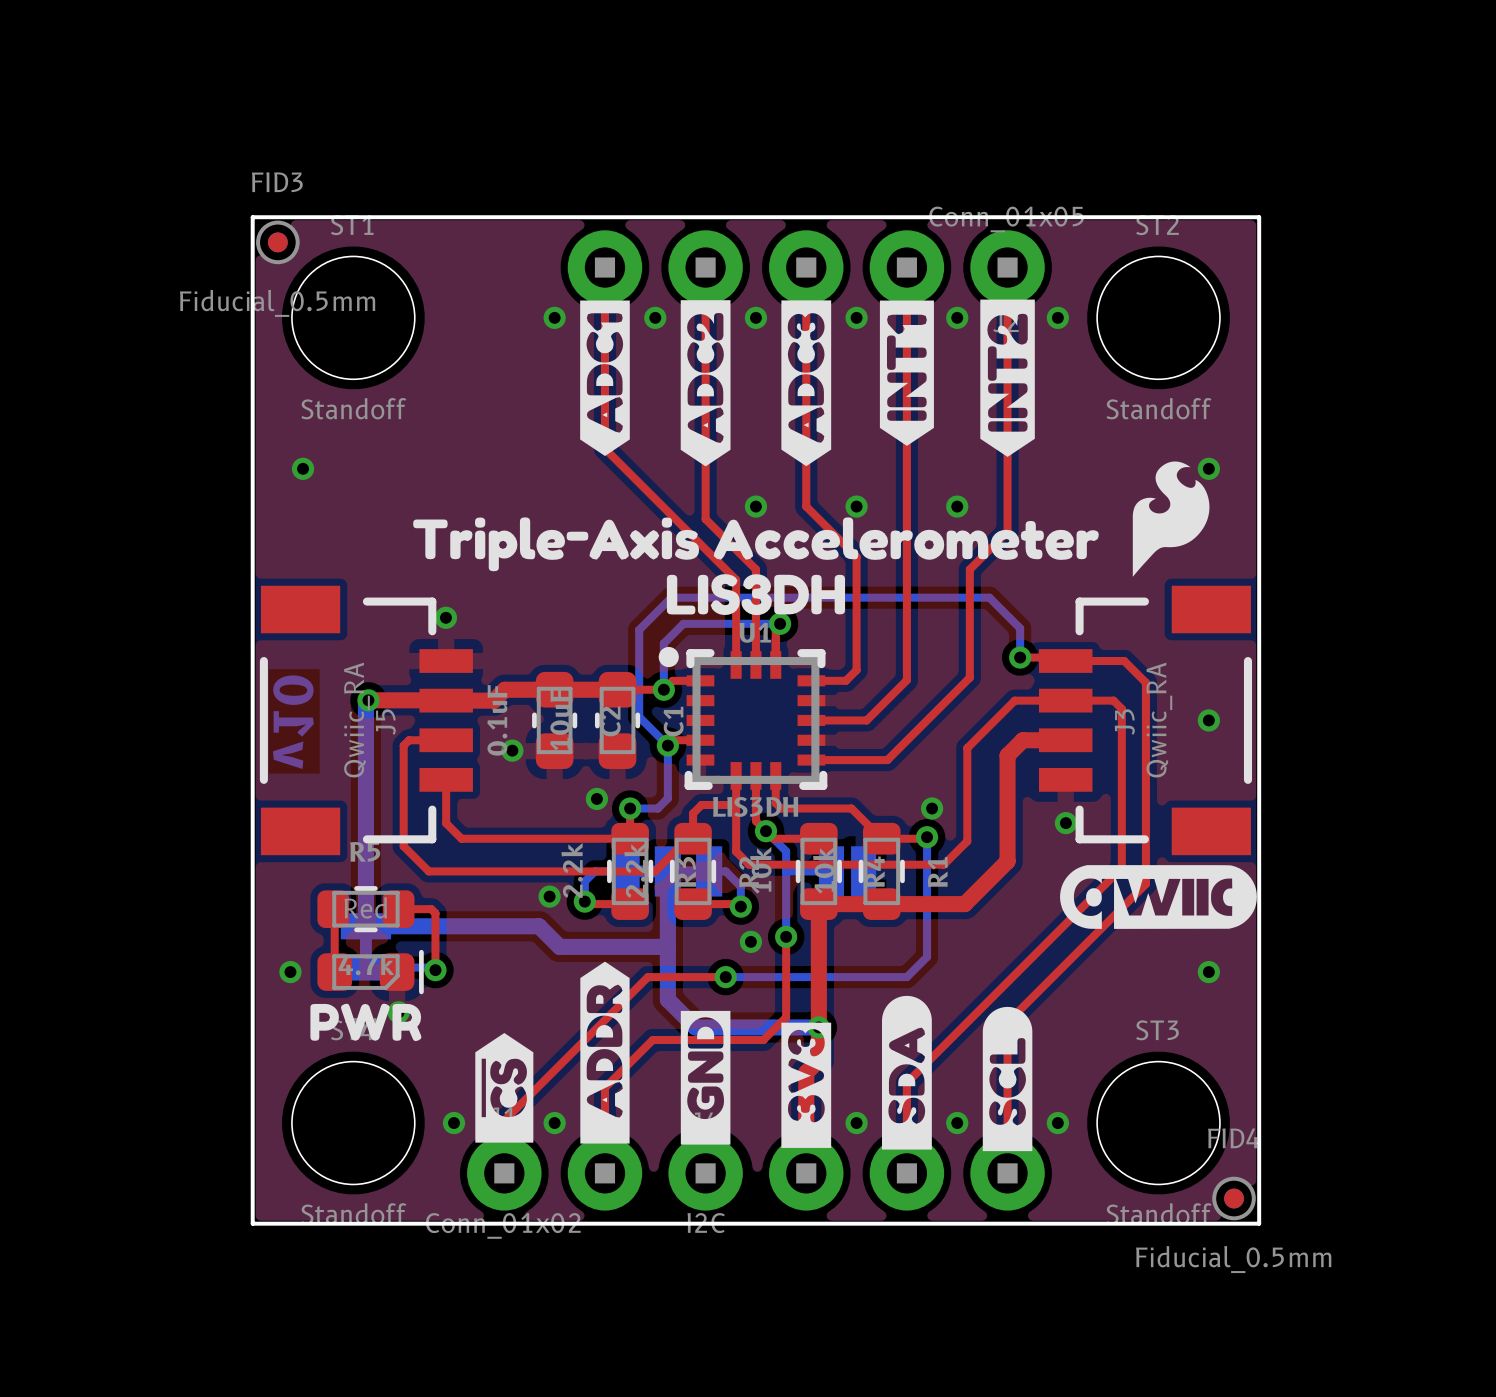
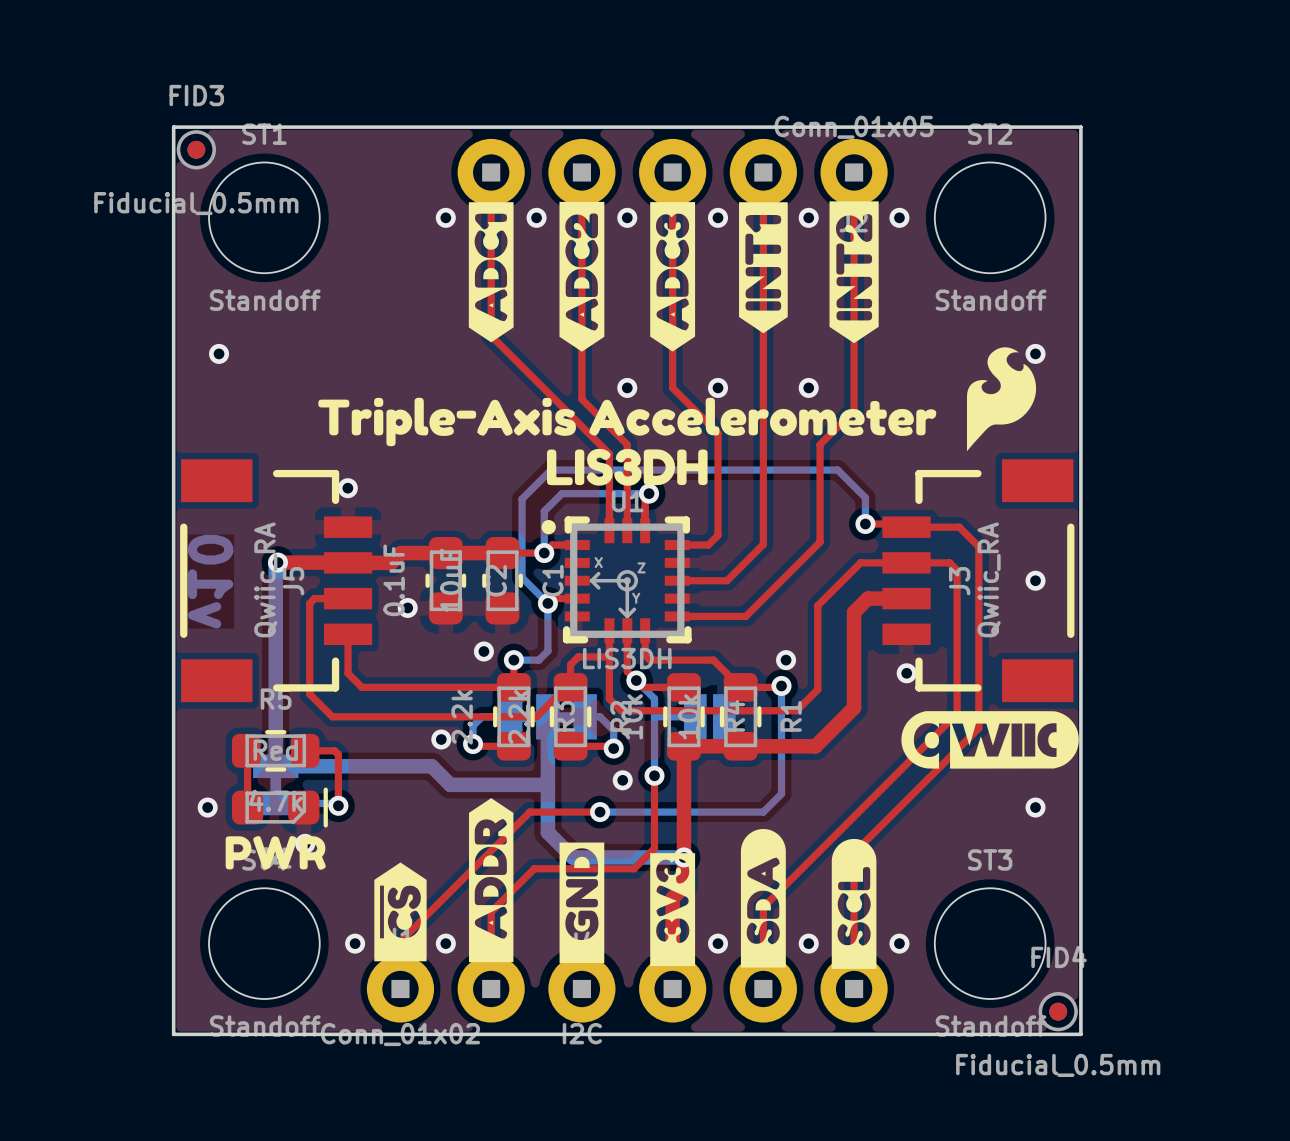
U1 footprint: [658, 646, 828, 790] -> [541, 516, 692, 644]

